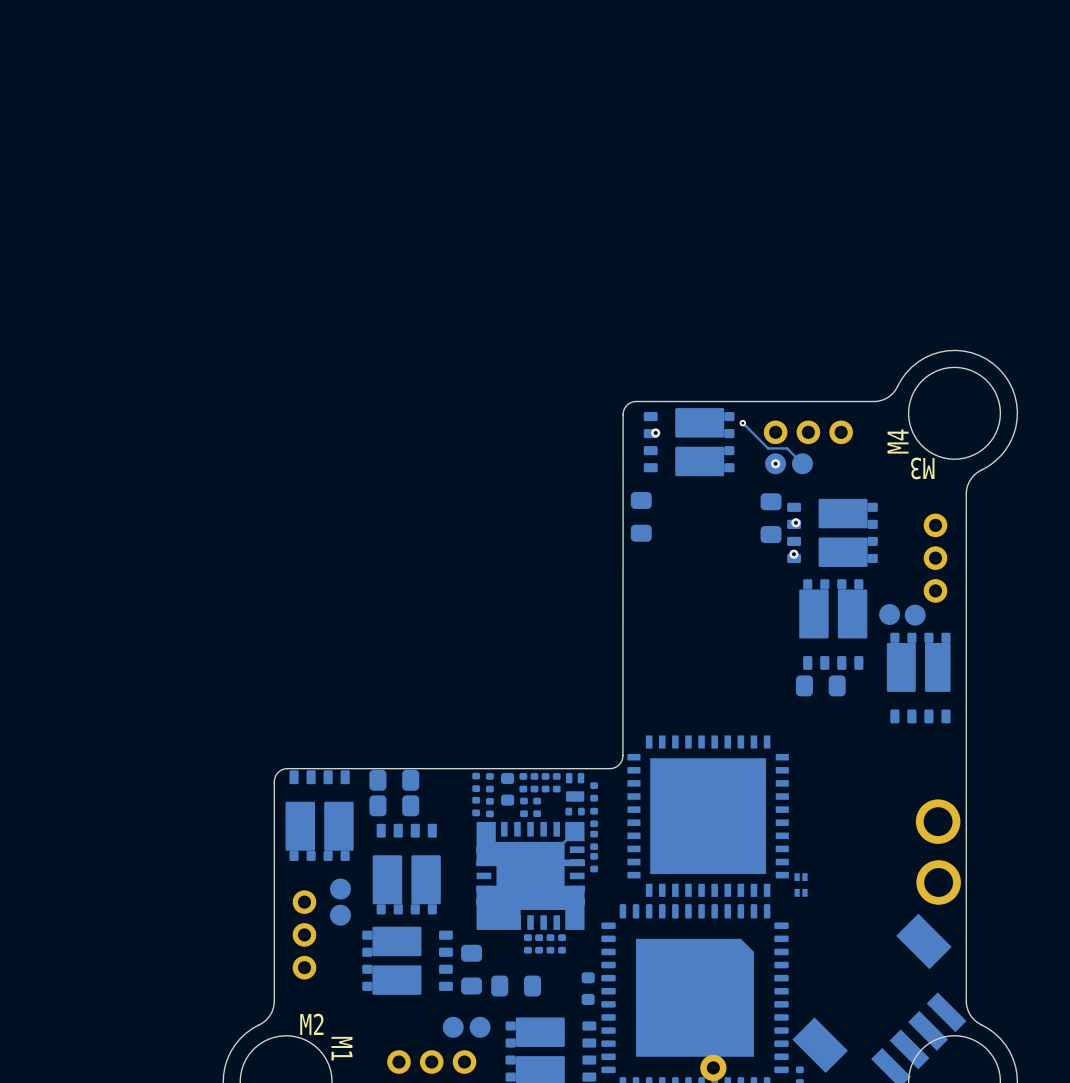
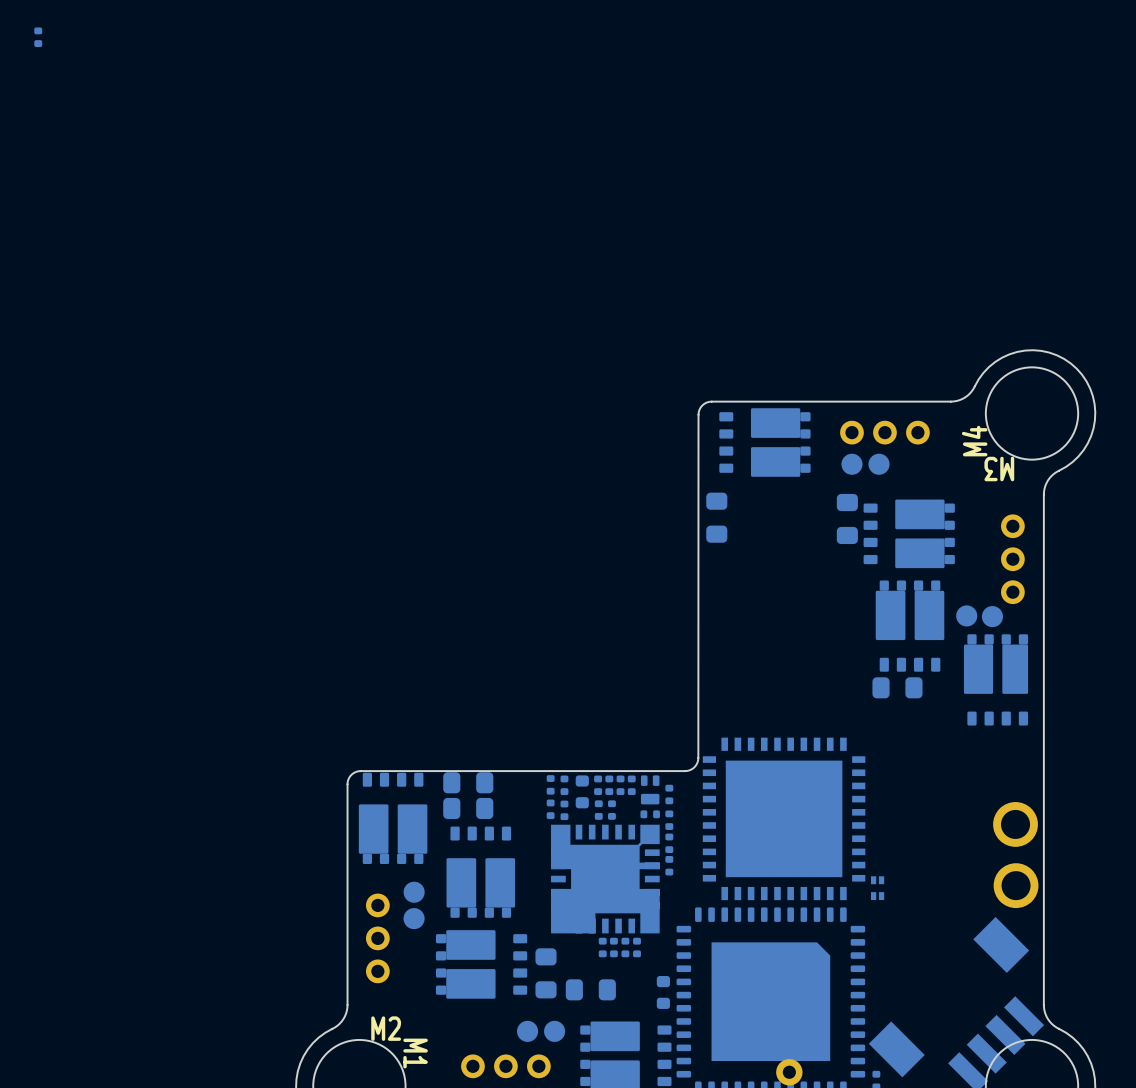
track: (742, 423) (768, 448) (787, 448) (802, 463) -> none
via: (742, 423) -> none
via: (655, 432) -> none
via: (775, 463) -> none
via: (795, 522) -> none
via: (793, 554) -> none

